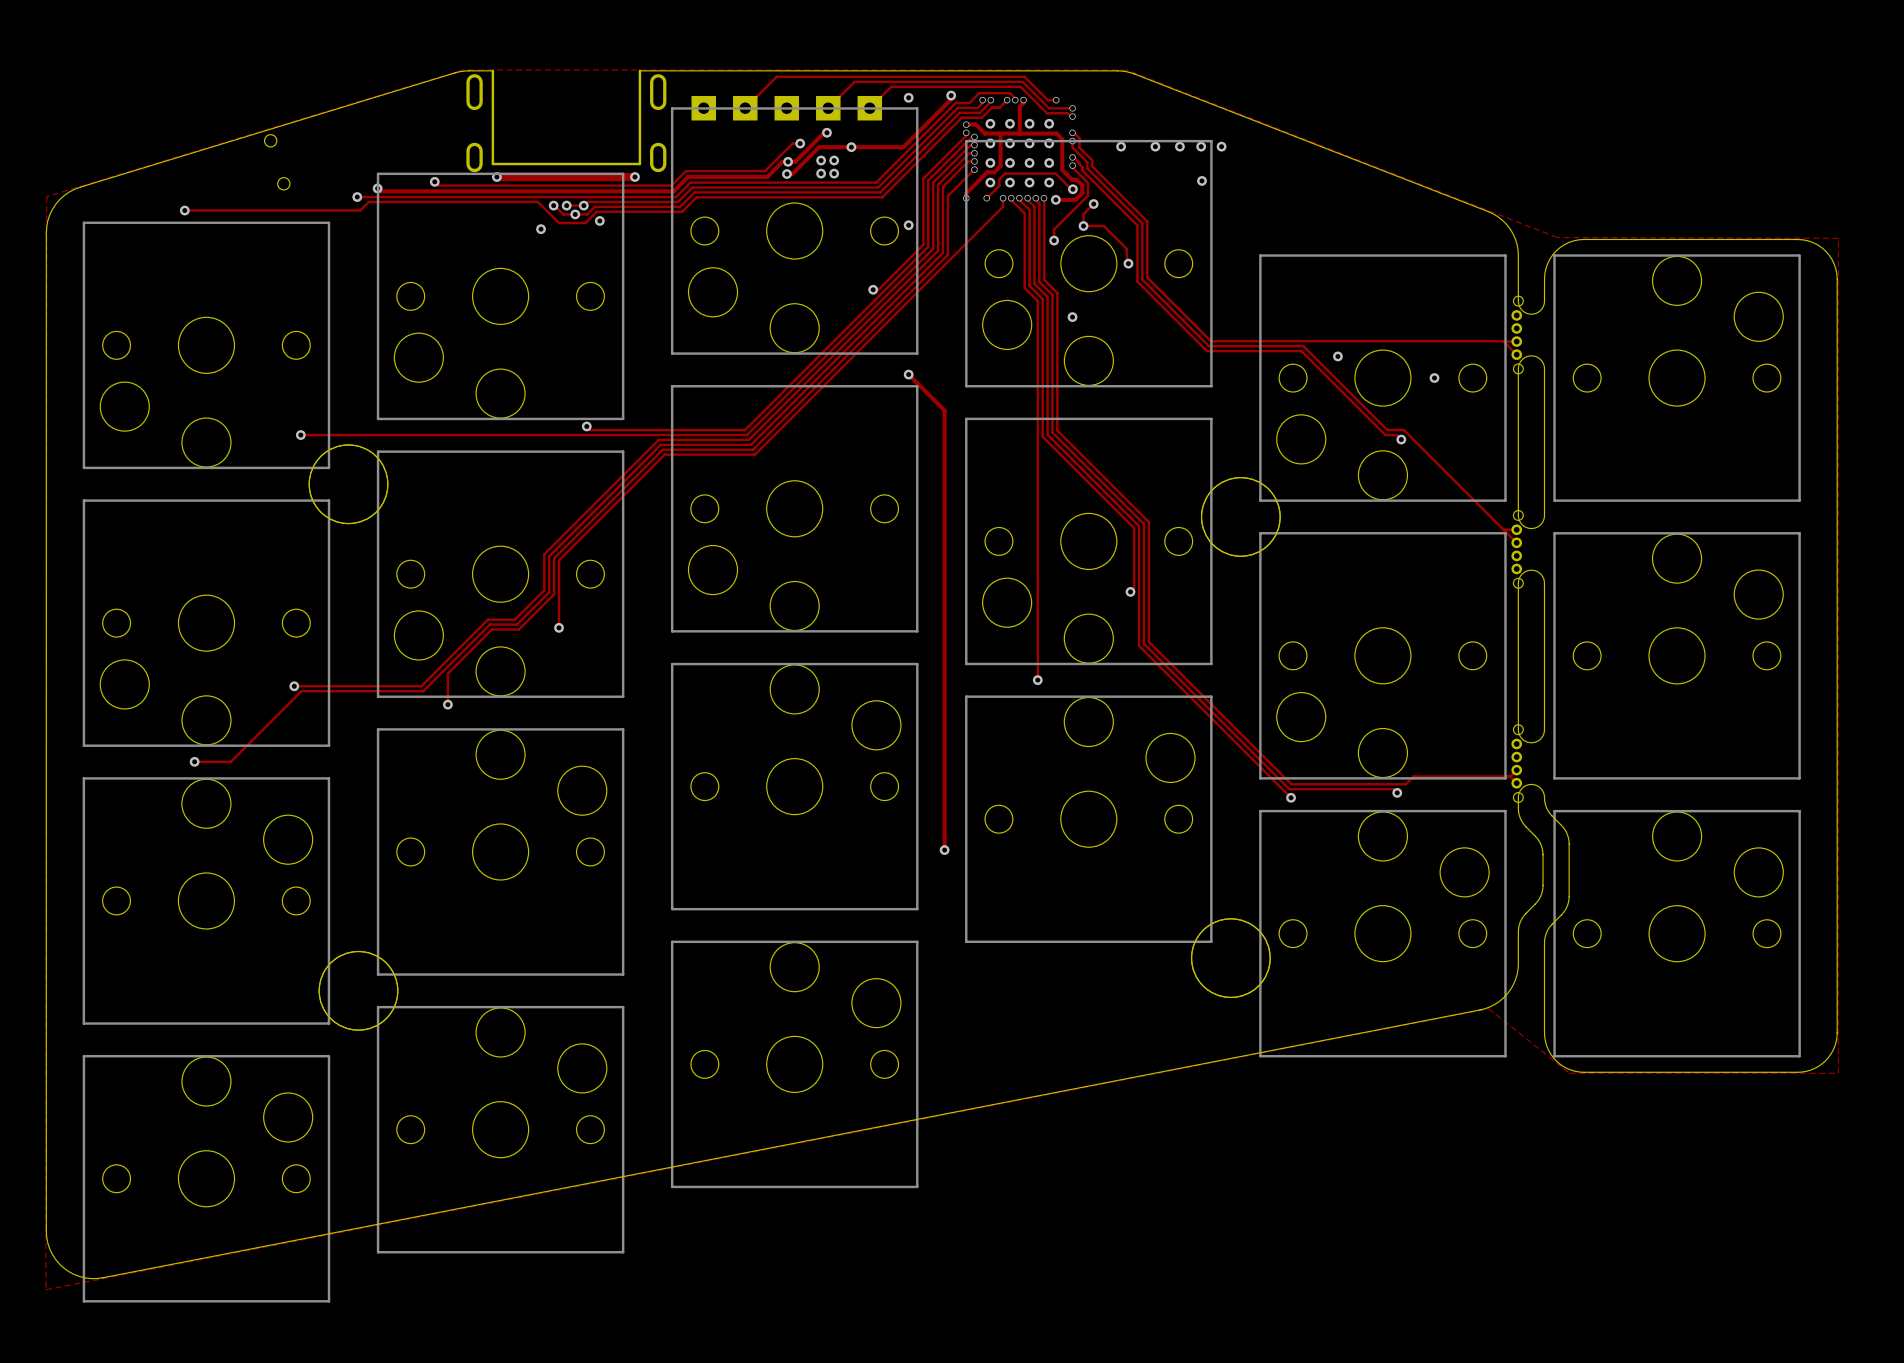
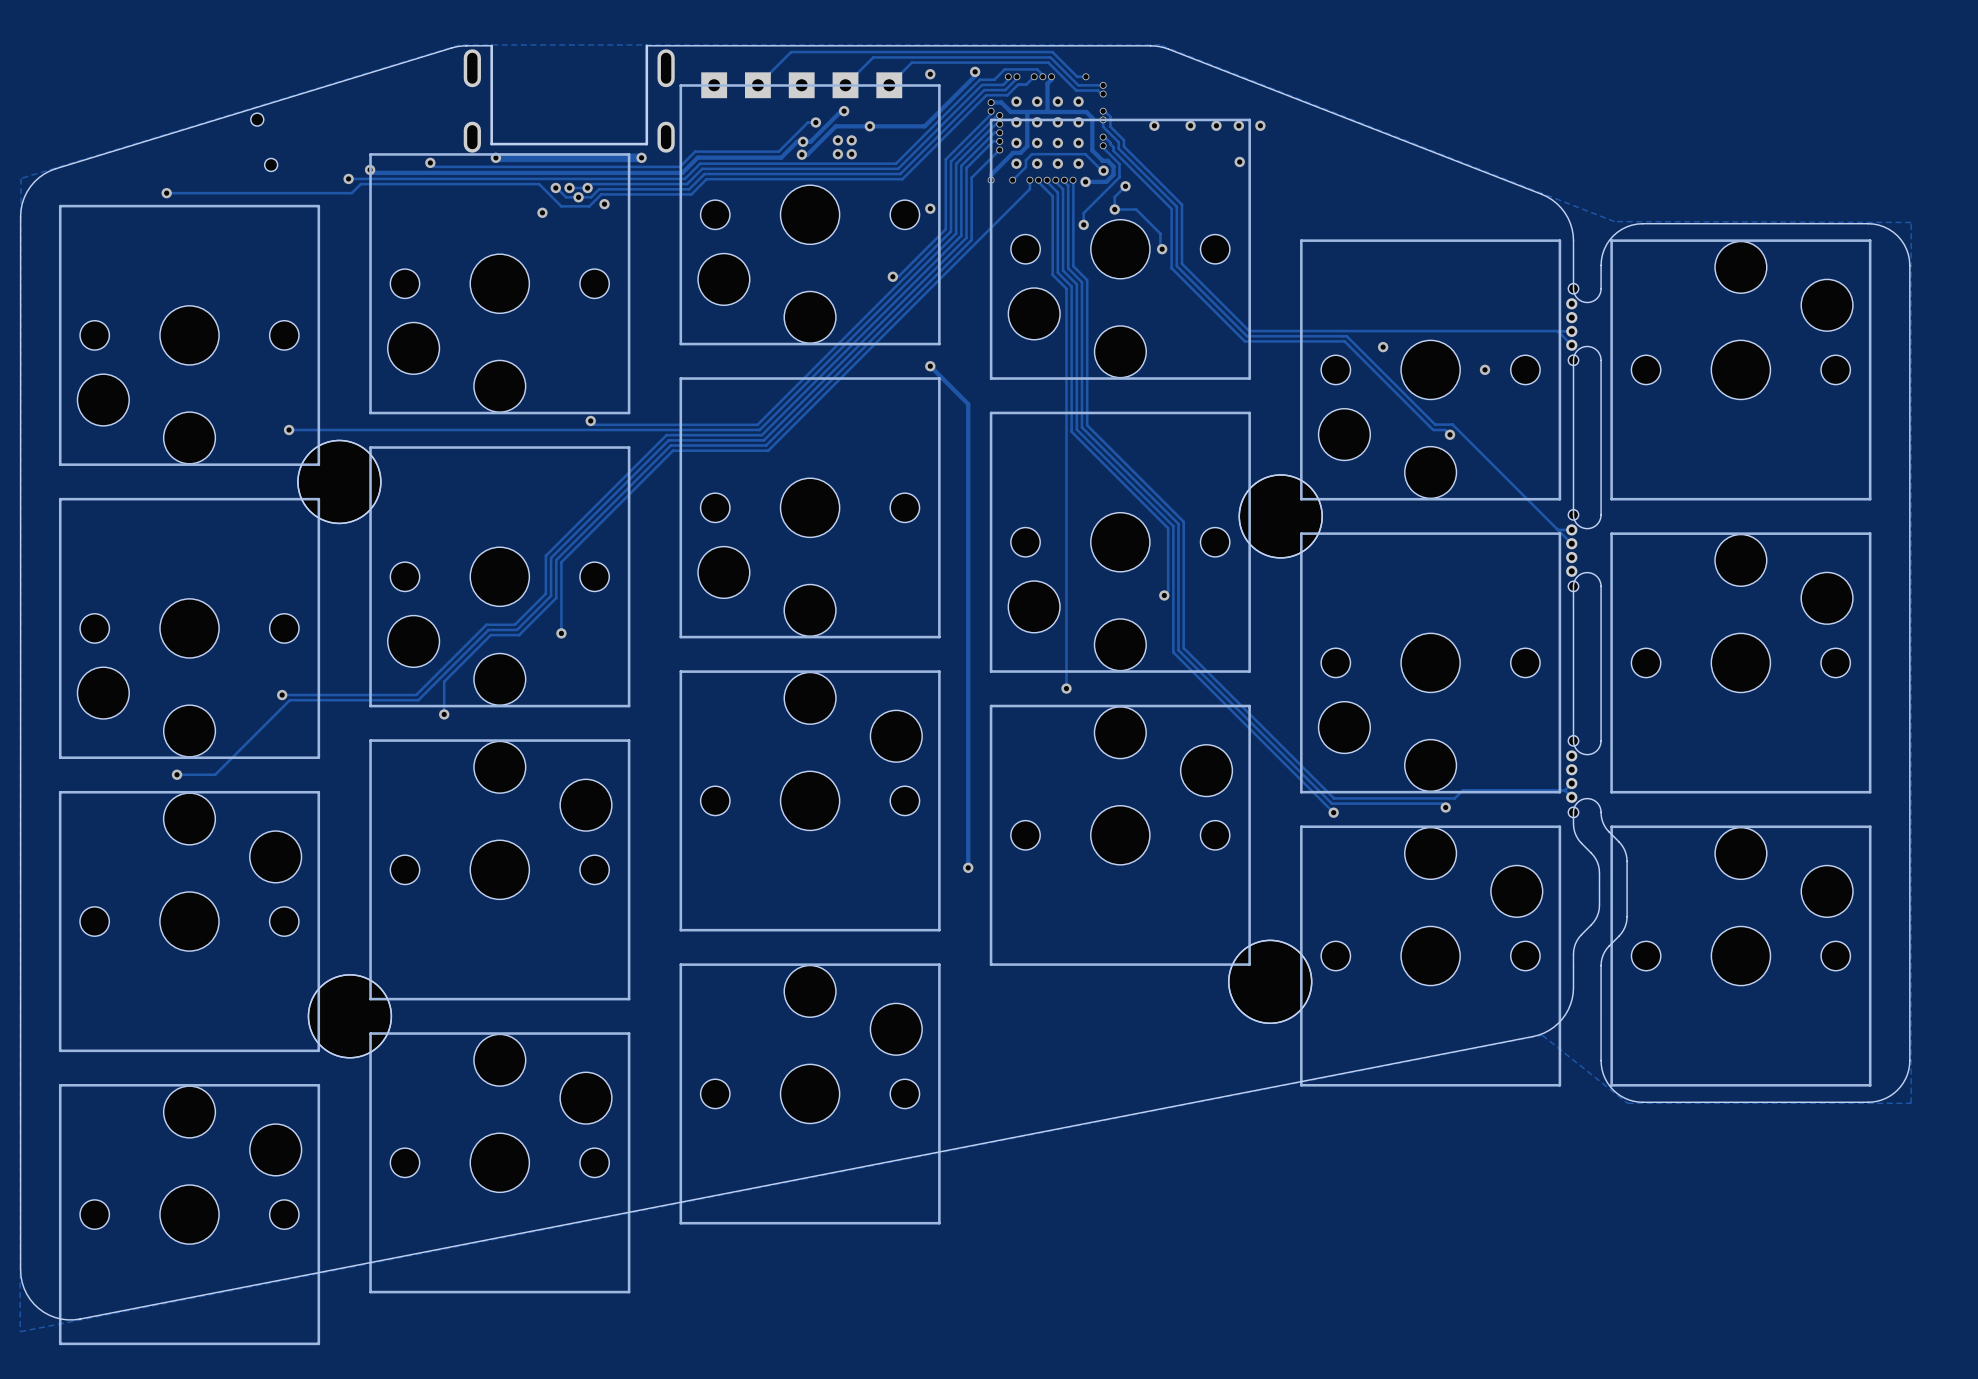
via: (1072, 317) -> none

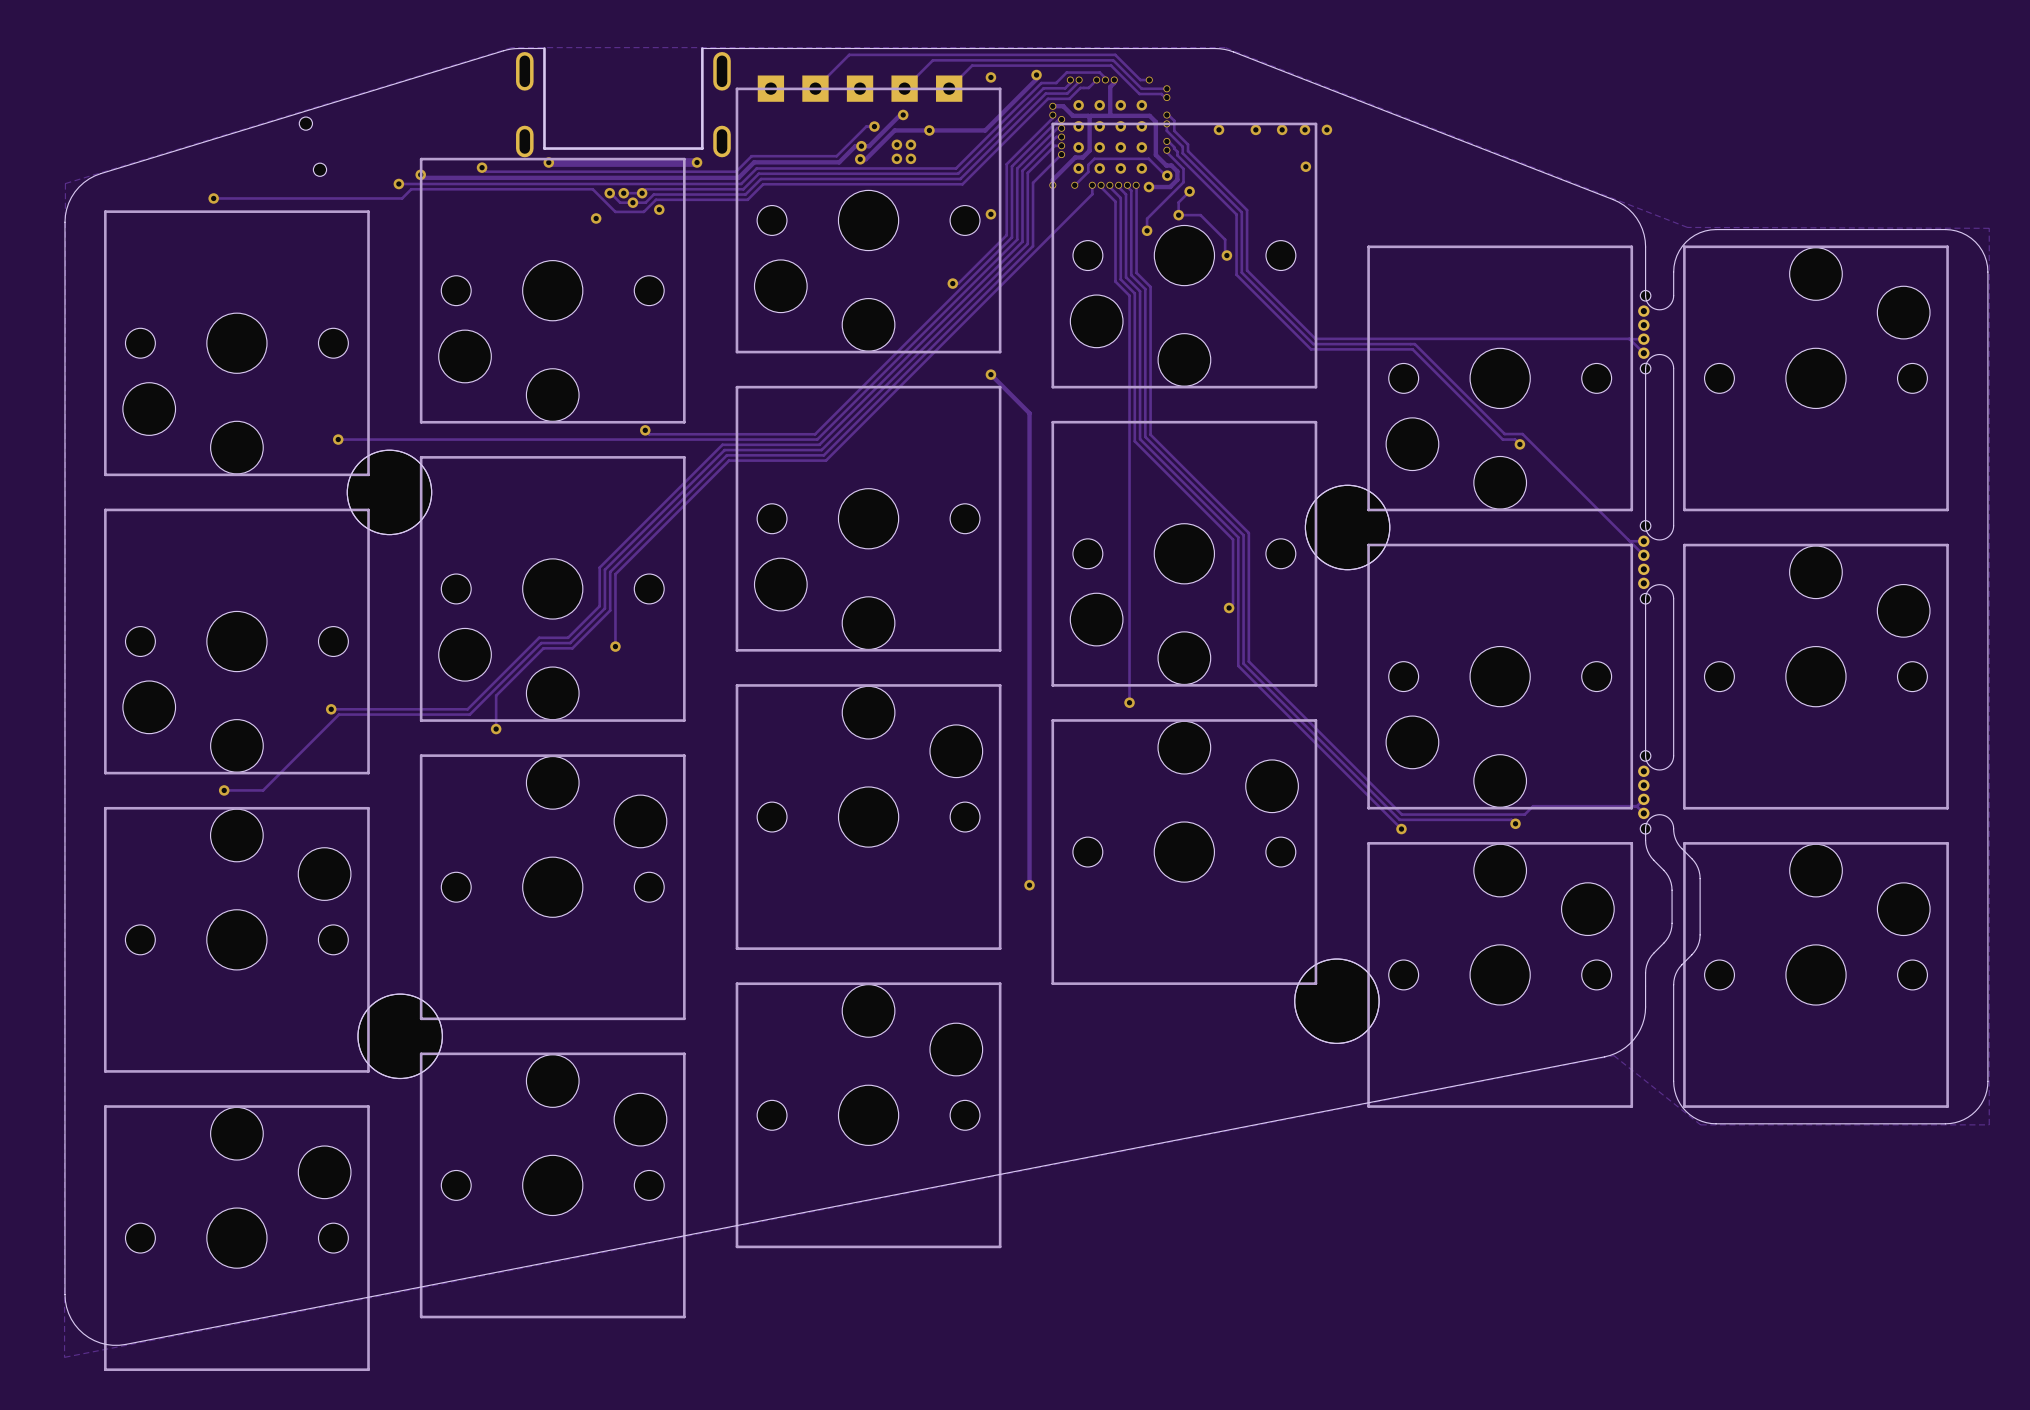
via: (1383, 347) -> none
via: (1485, 369) -> none

